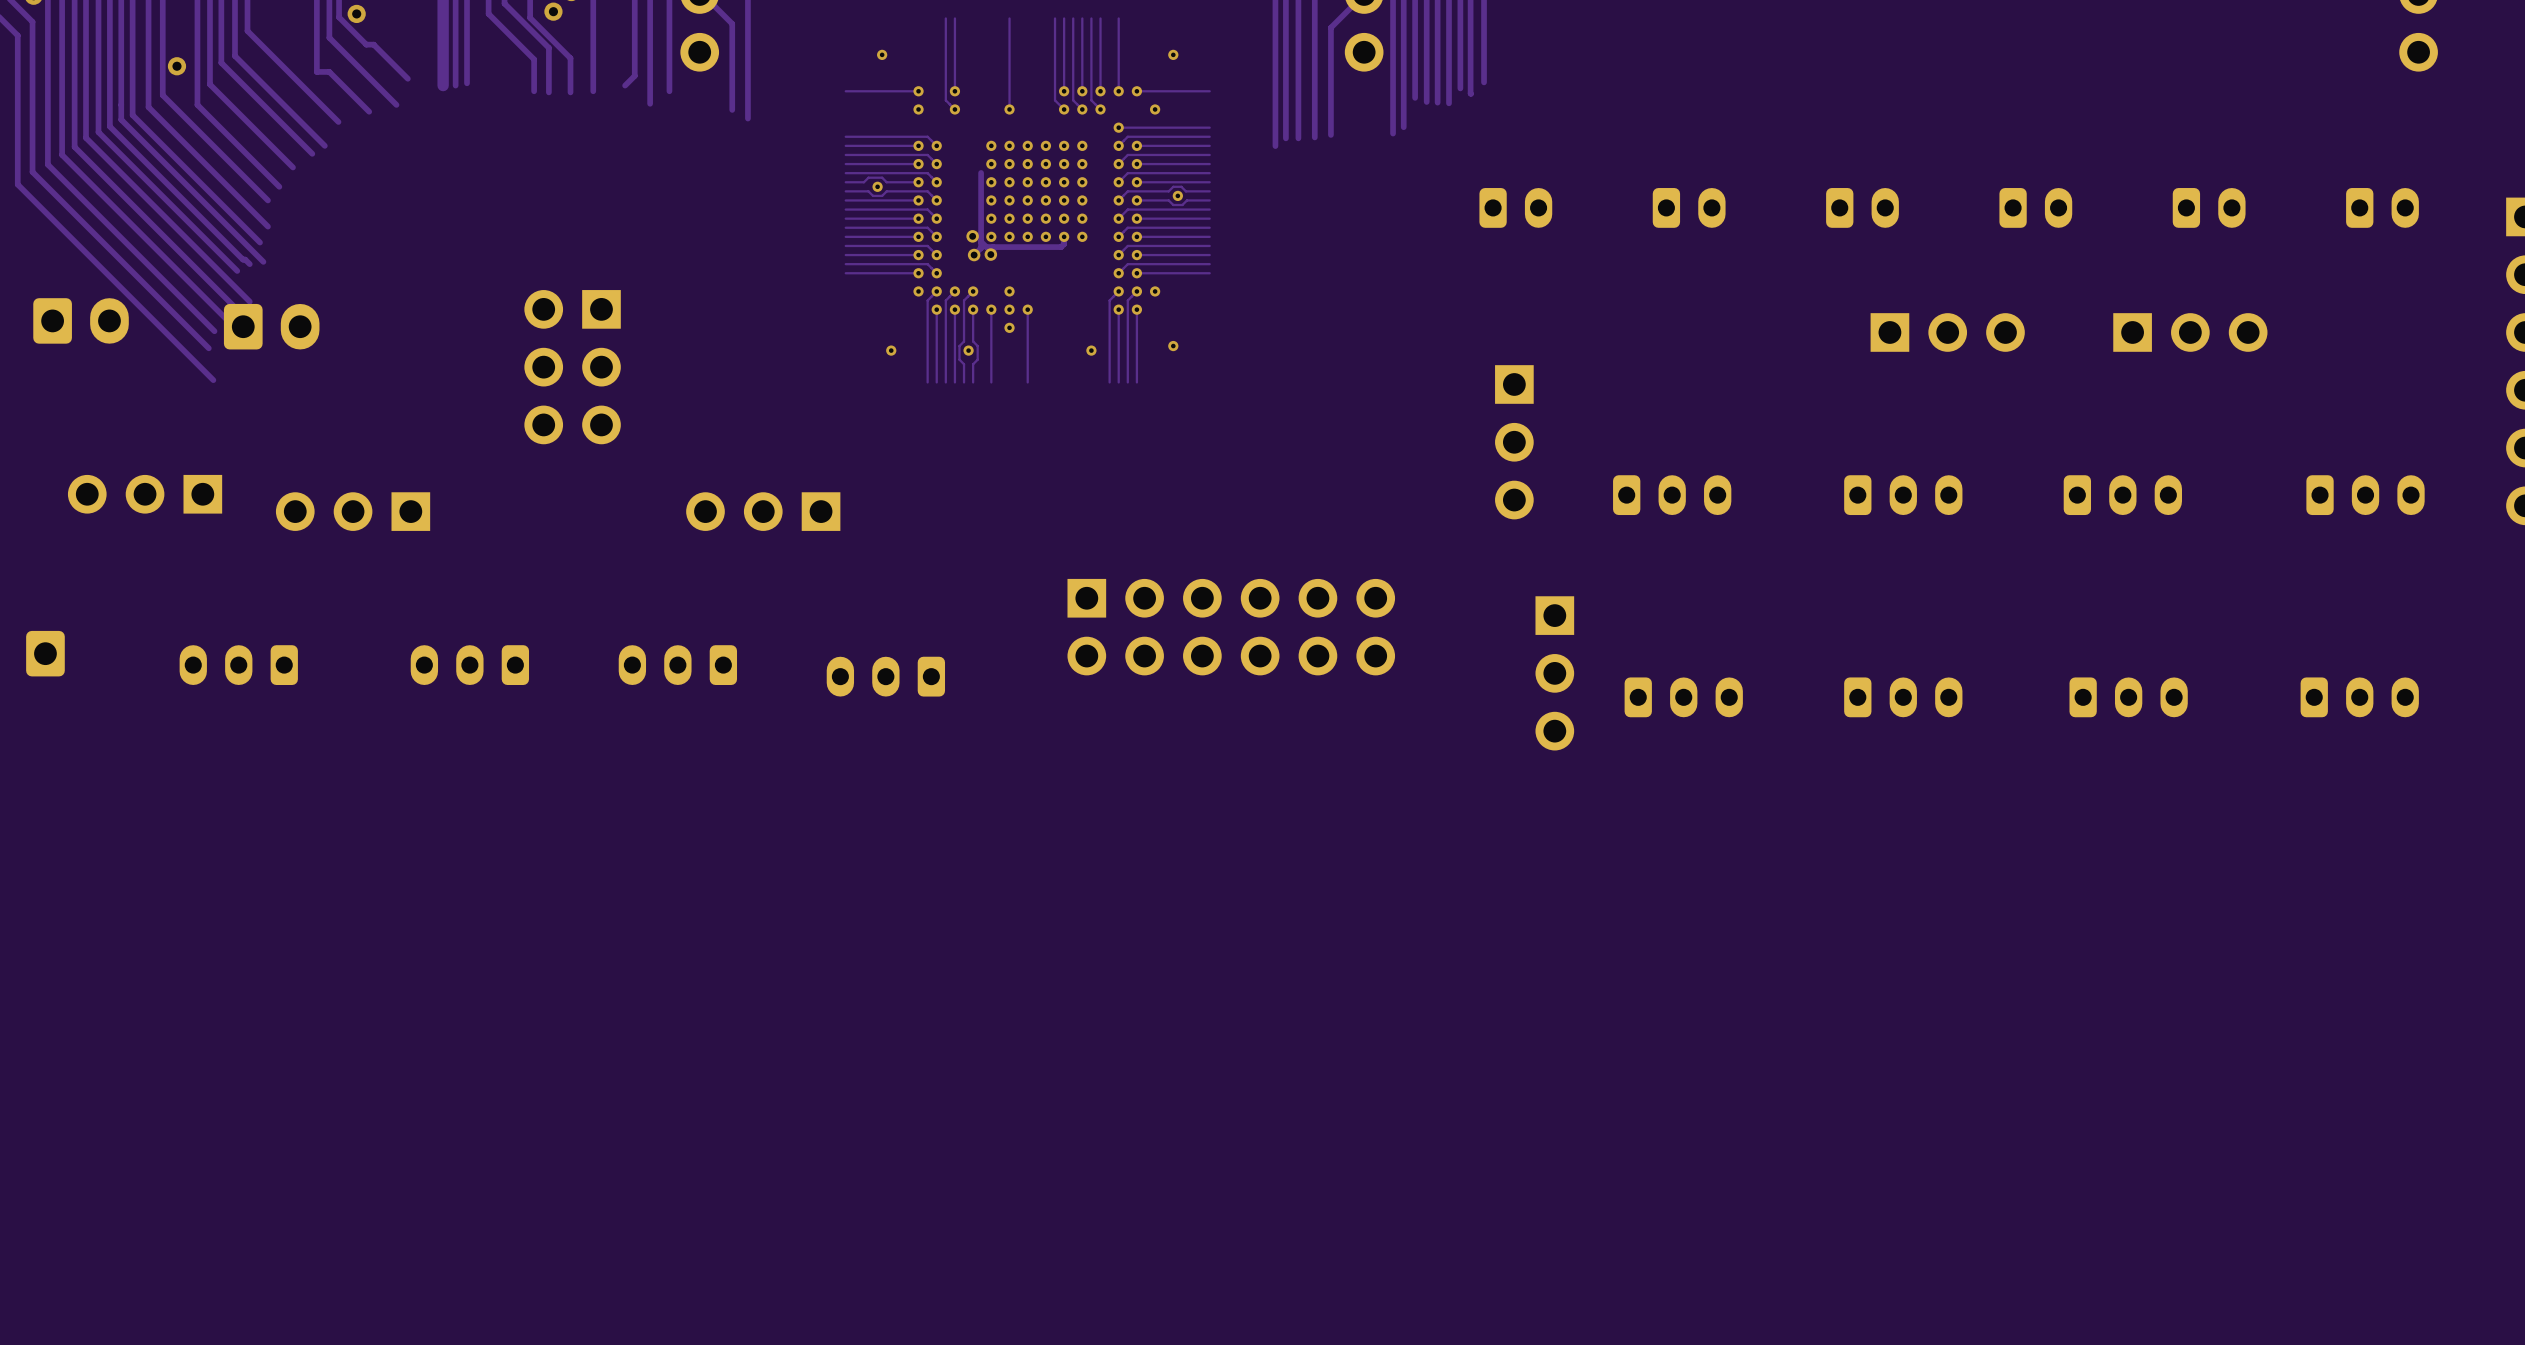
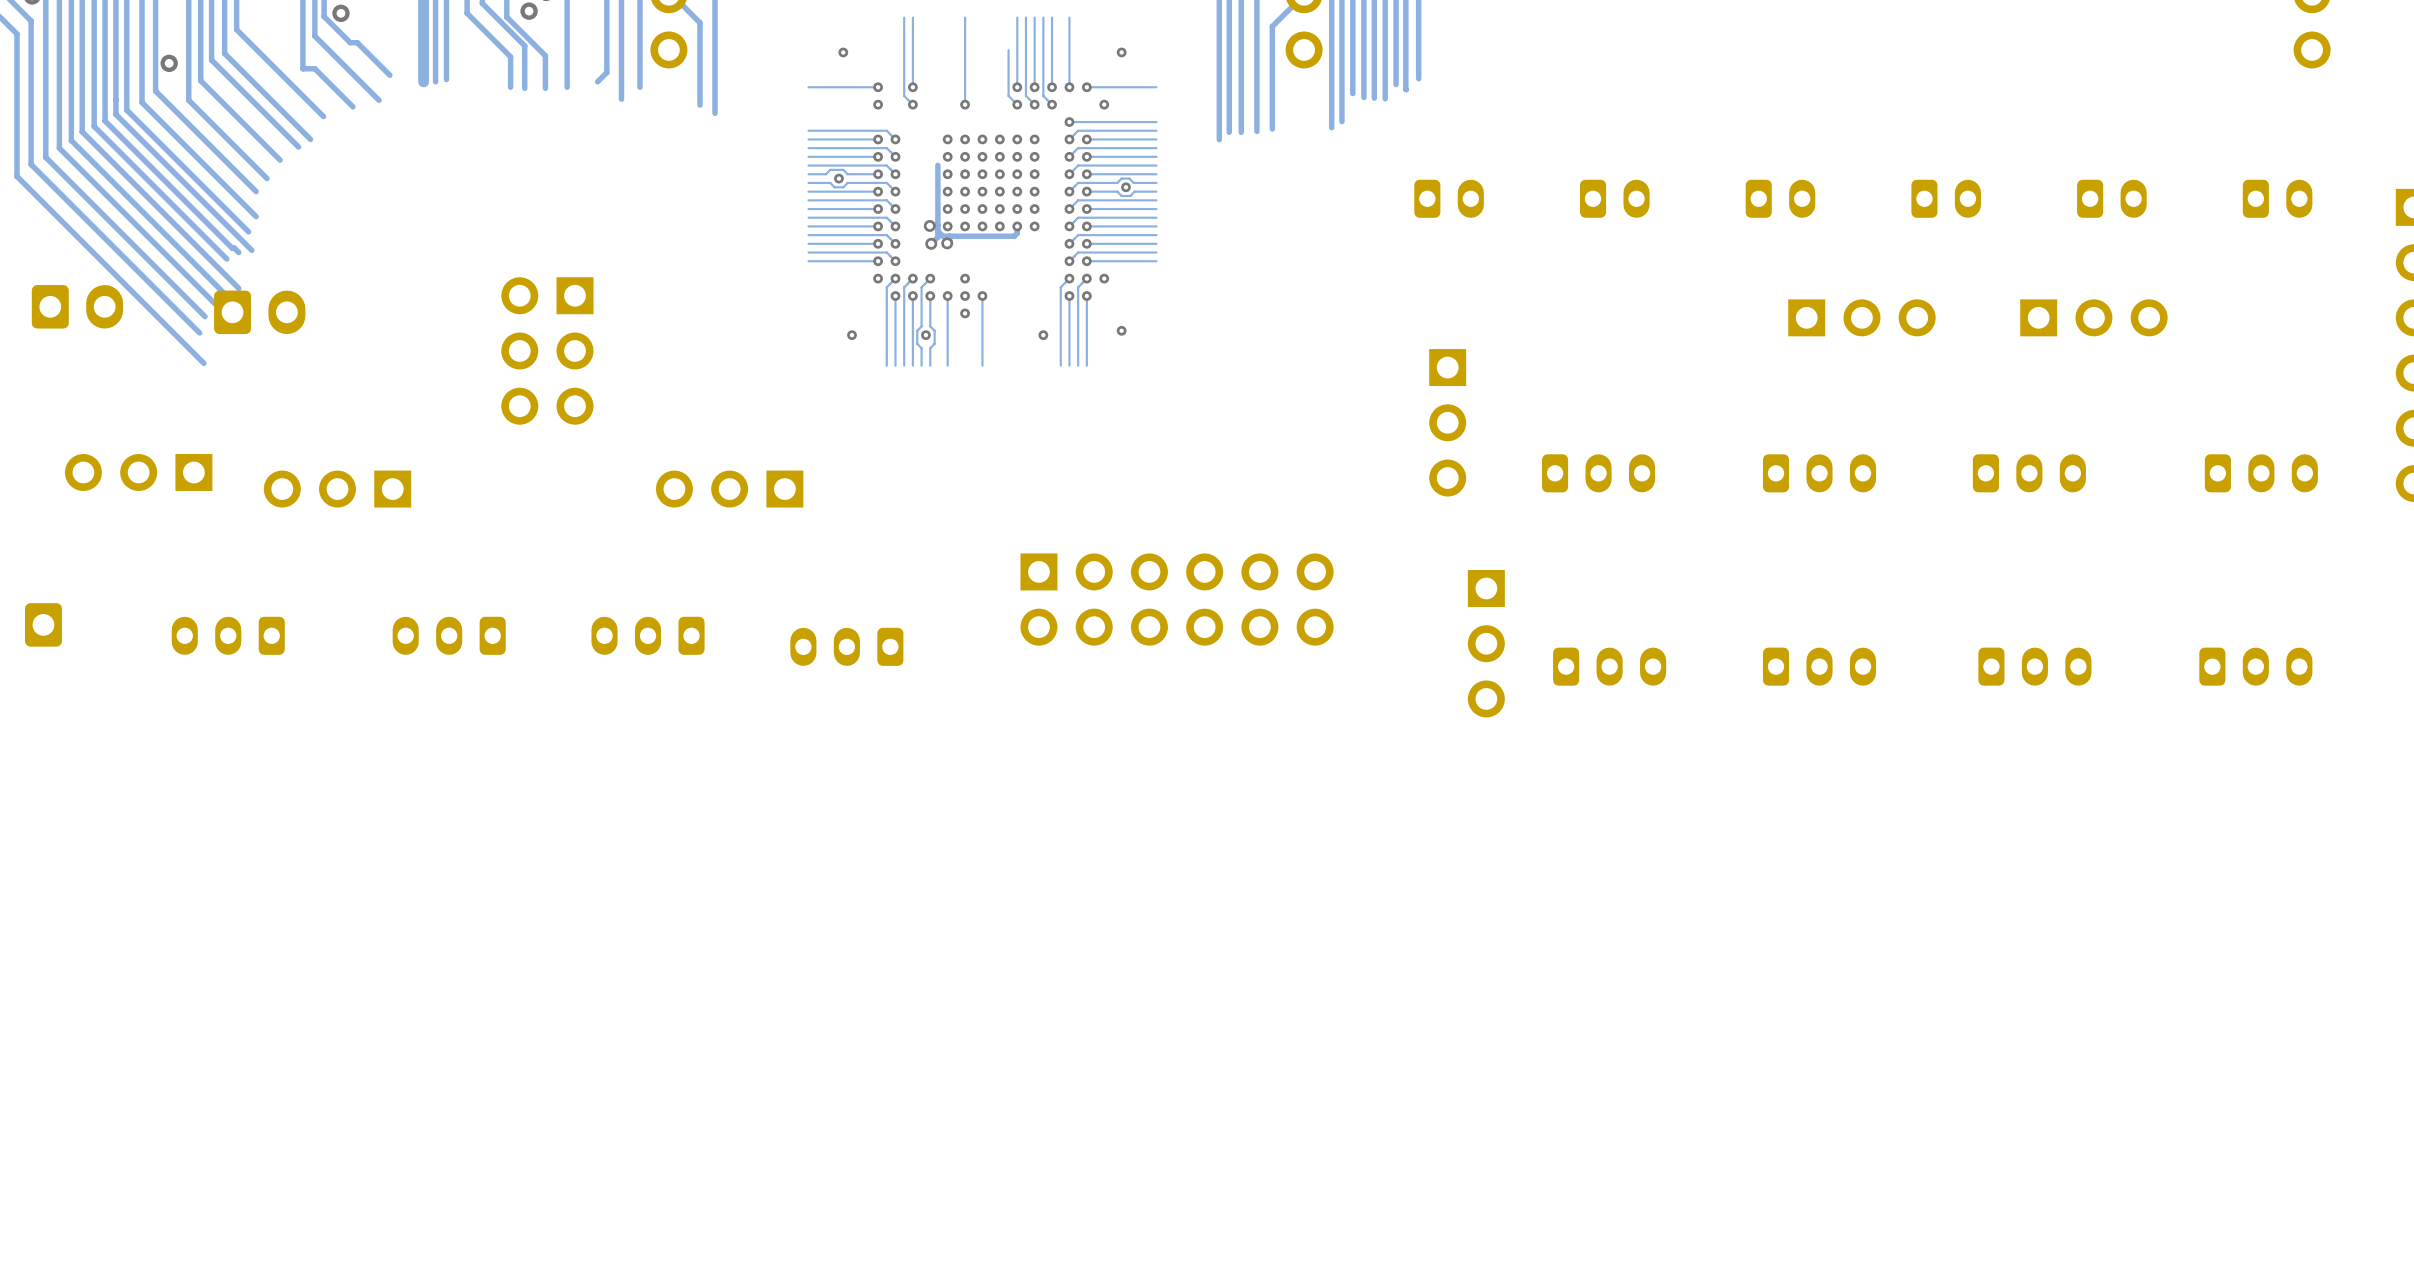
track: (1055, 18) (1055, 52) -> none

